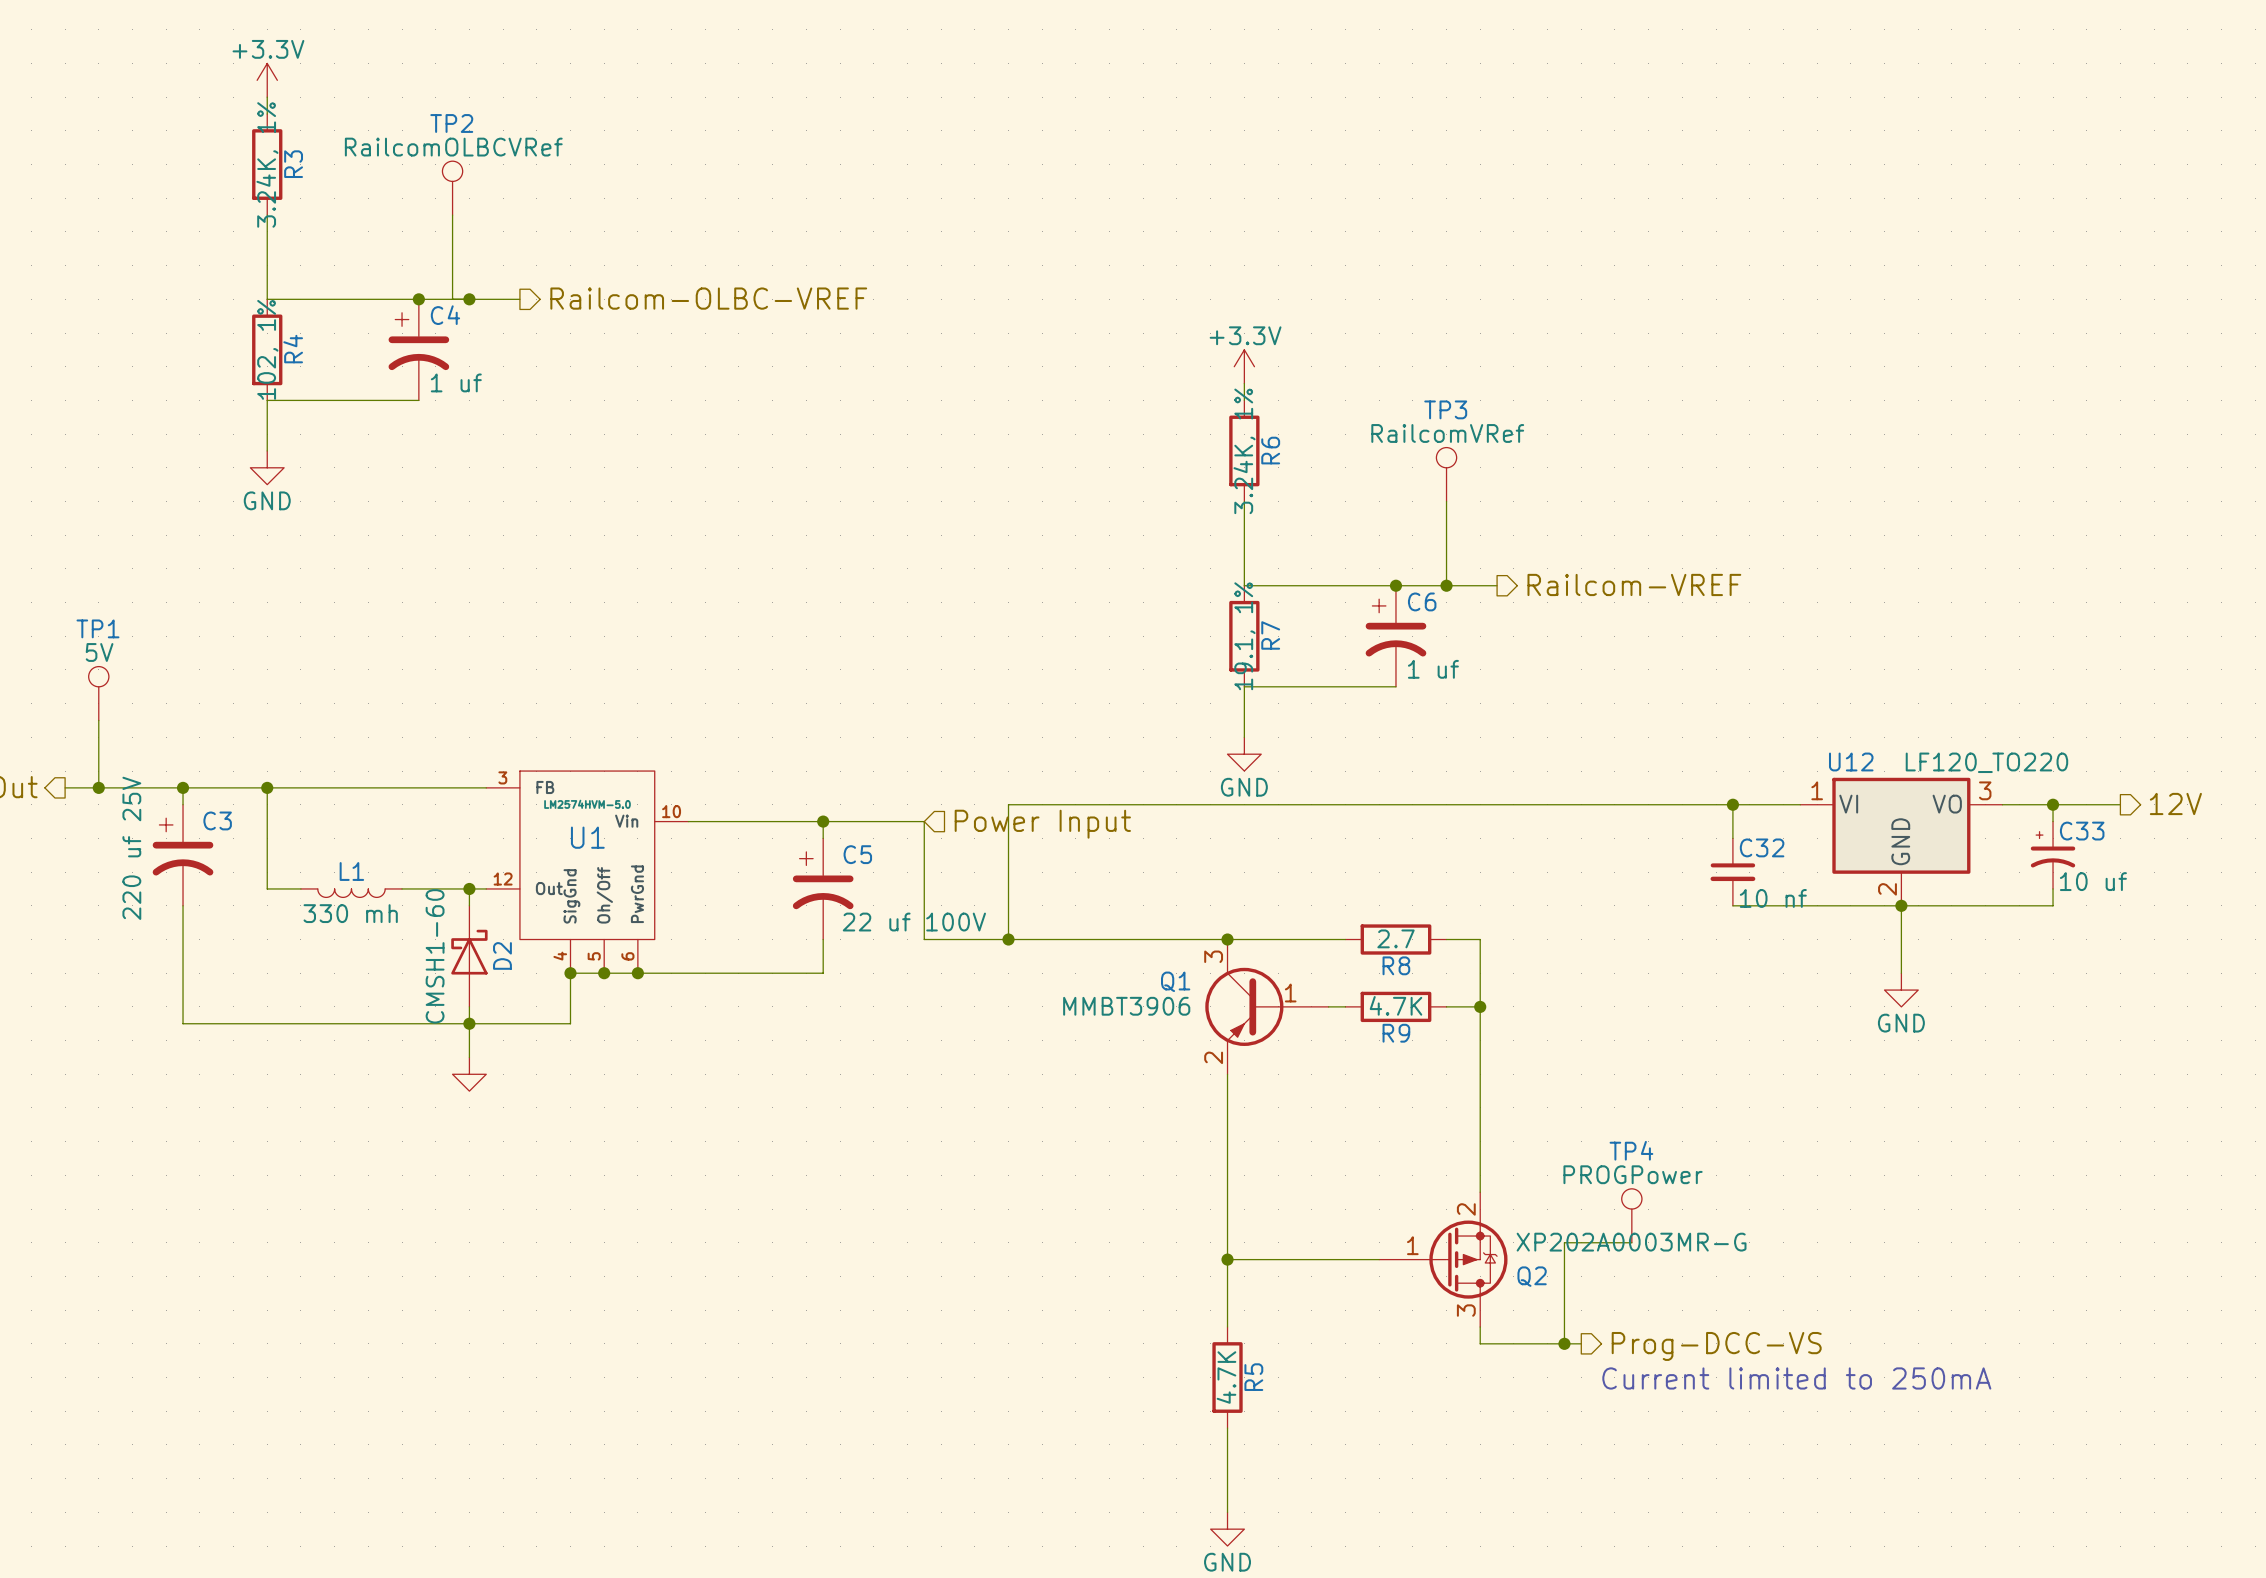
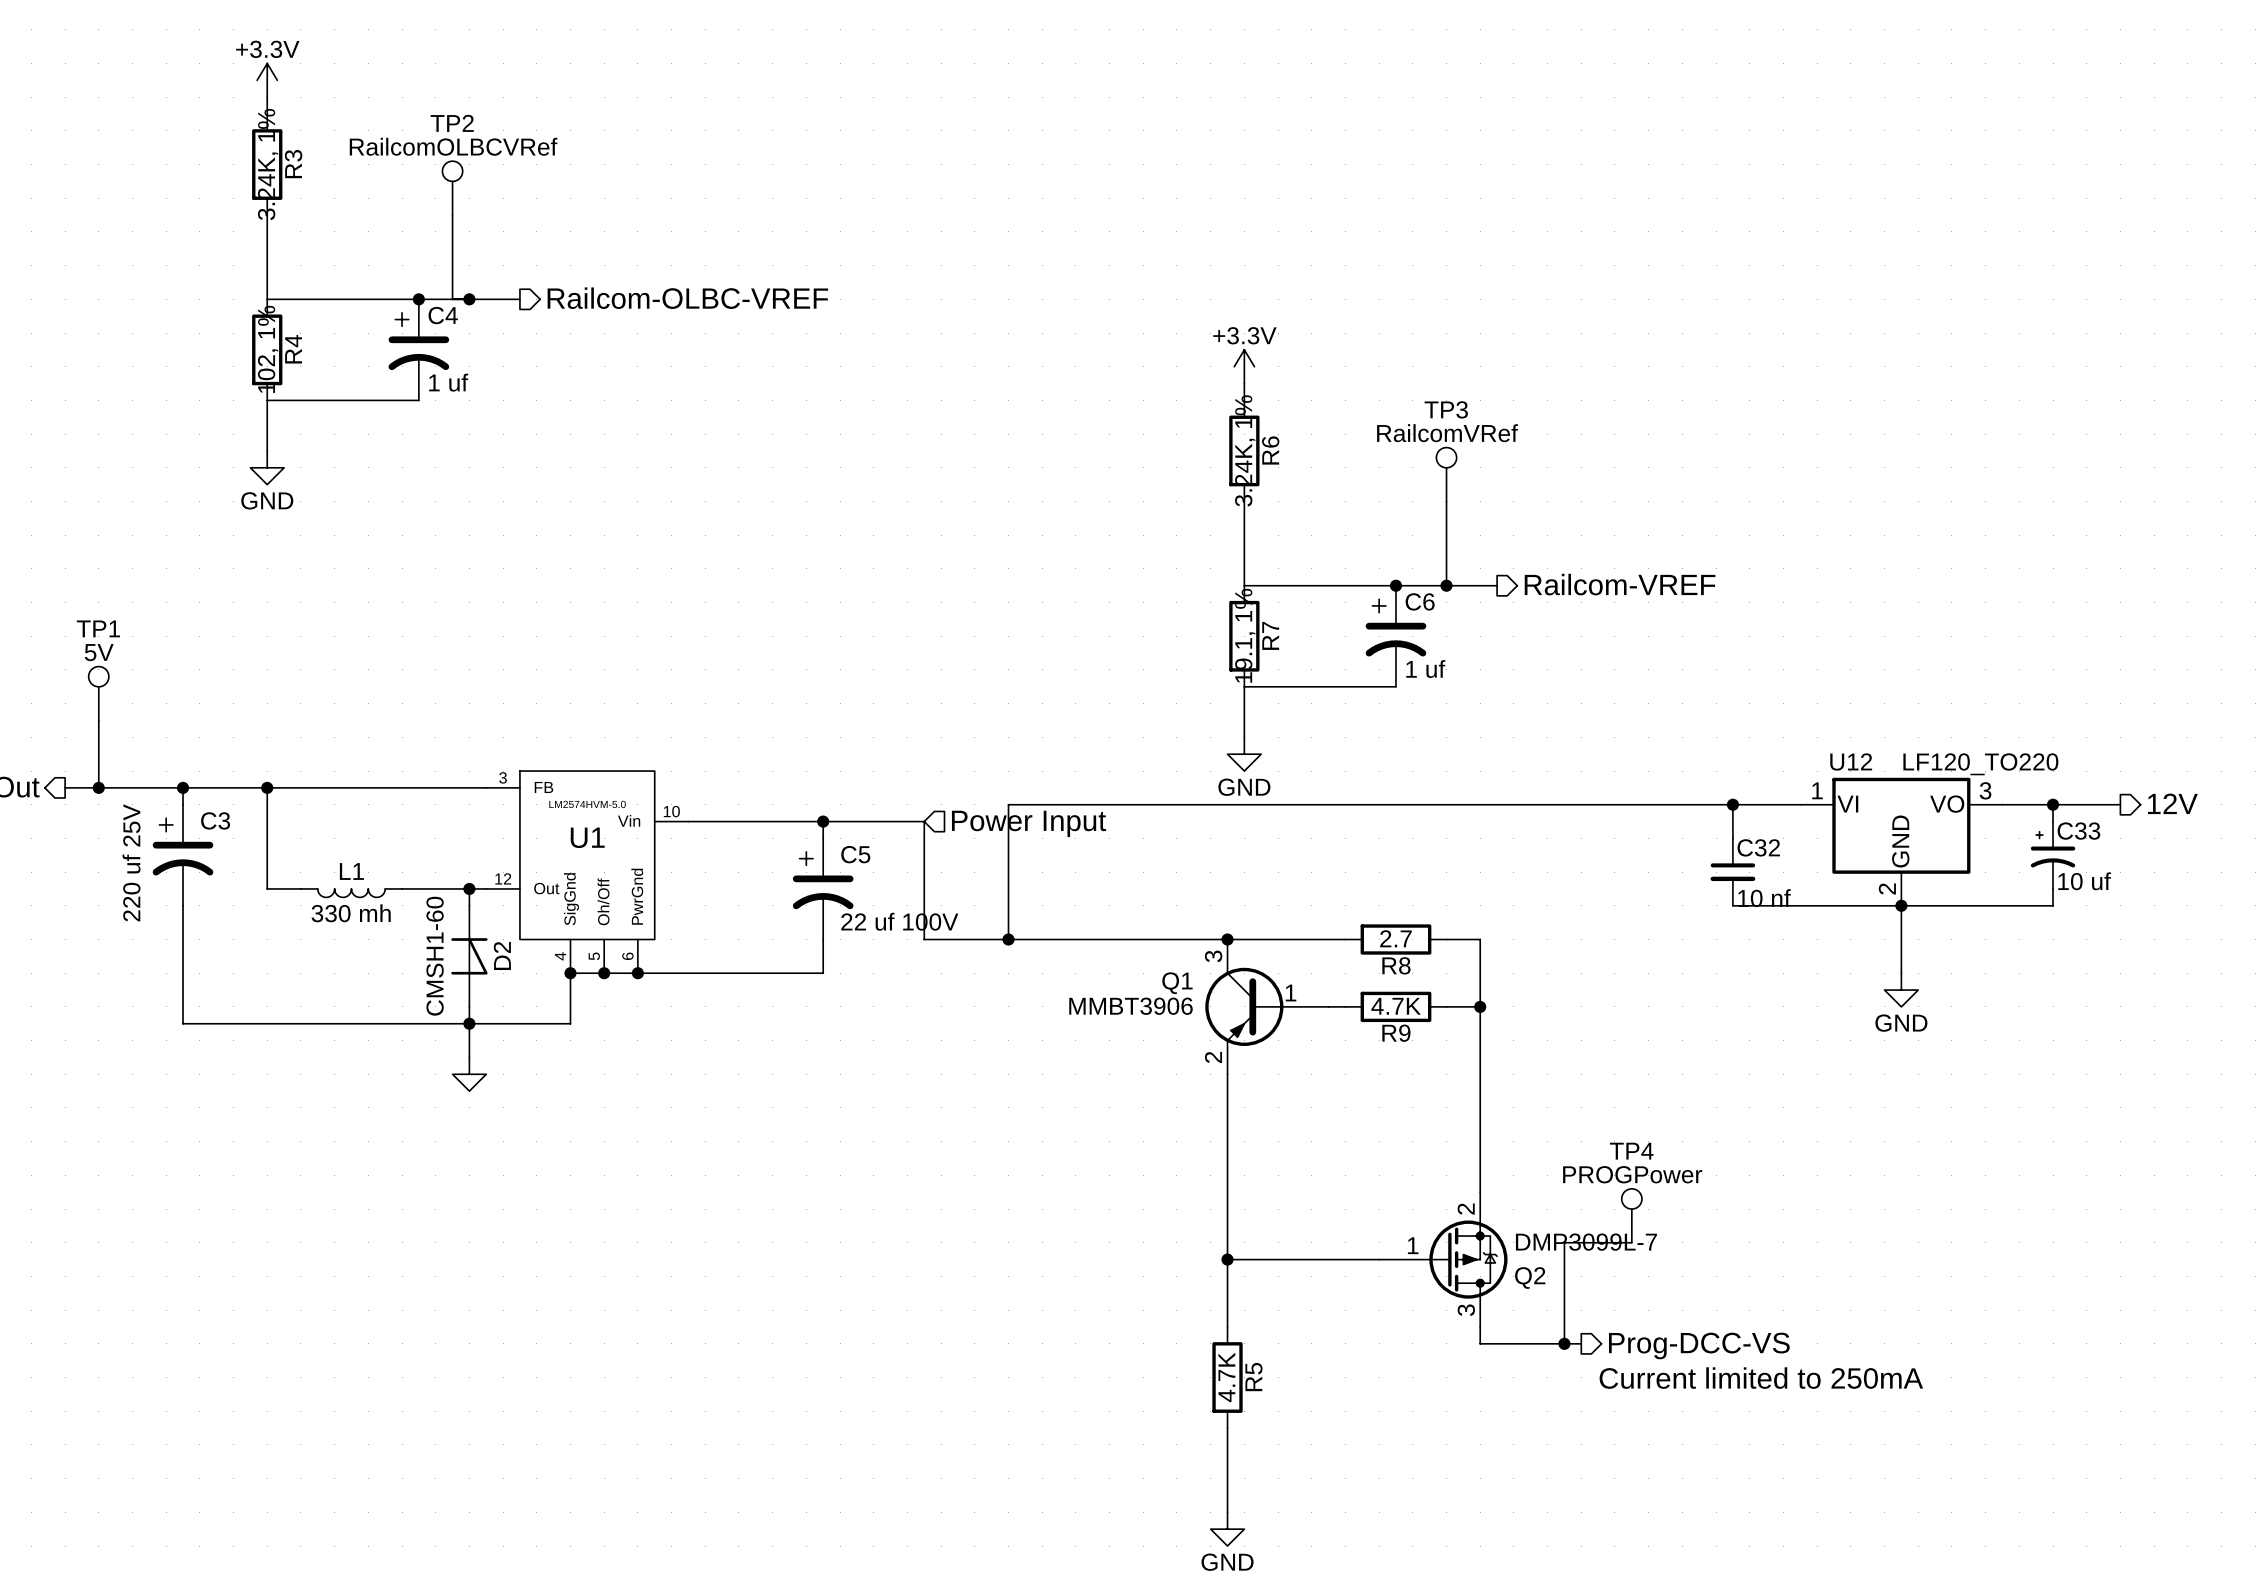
D2 symbol: [451, 905, 488, 1007] -> [451, 905, 488, 1007]
Q2 value: XP202A0003MR-G (1631, 1242) -> DMP3099L-7 (1586, 1242)

